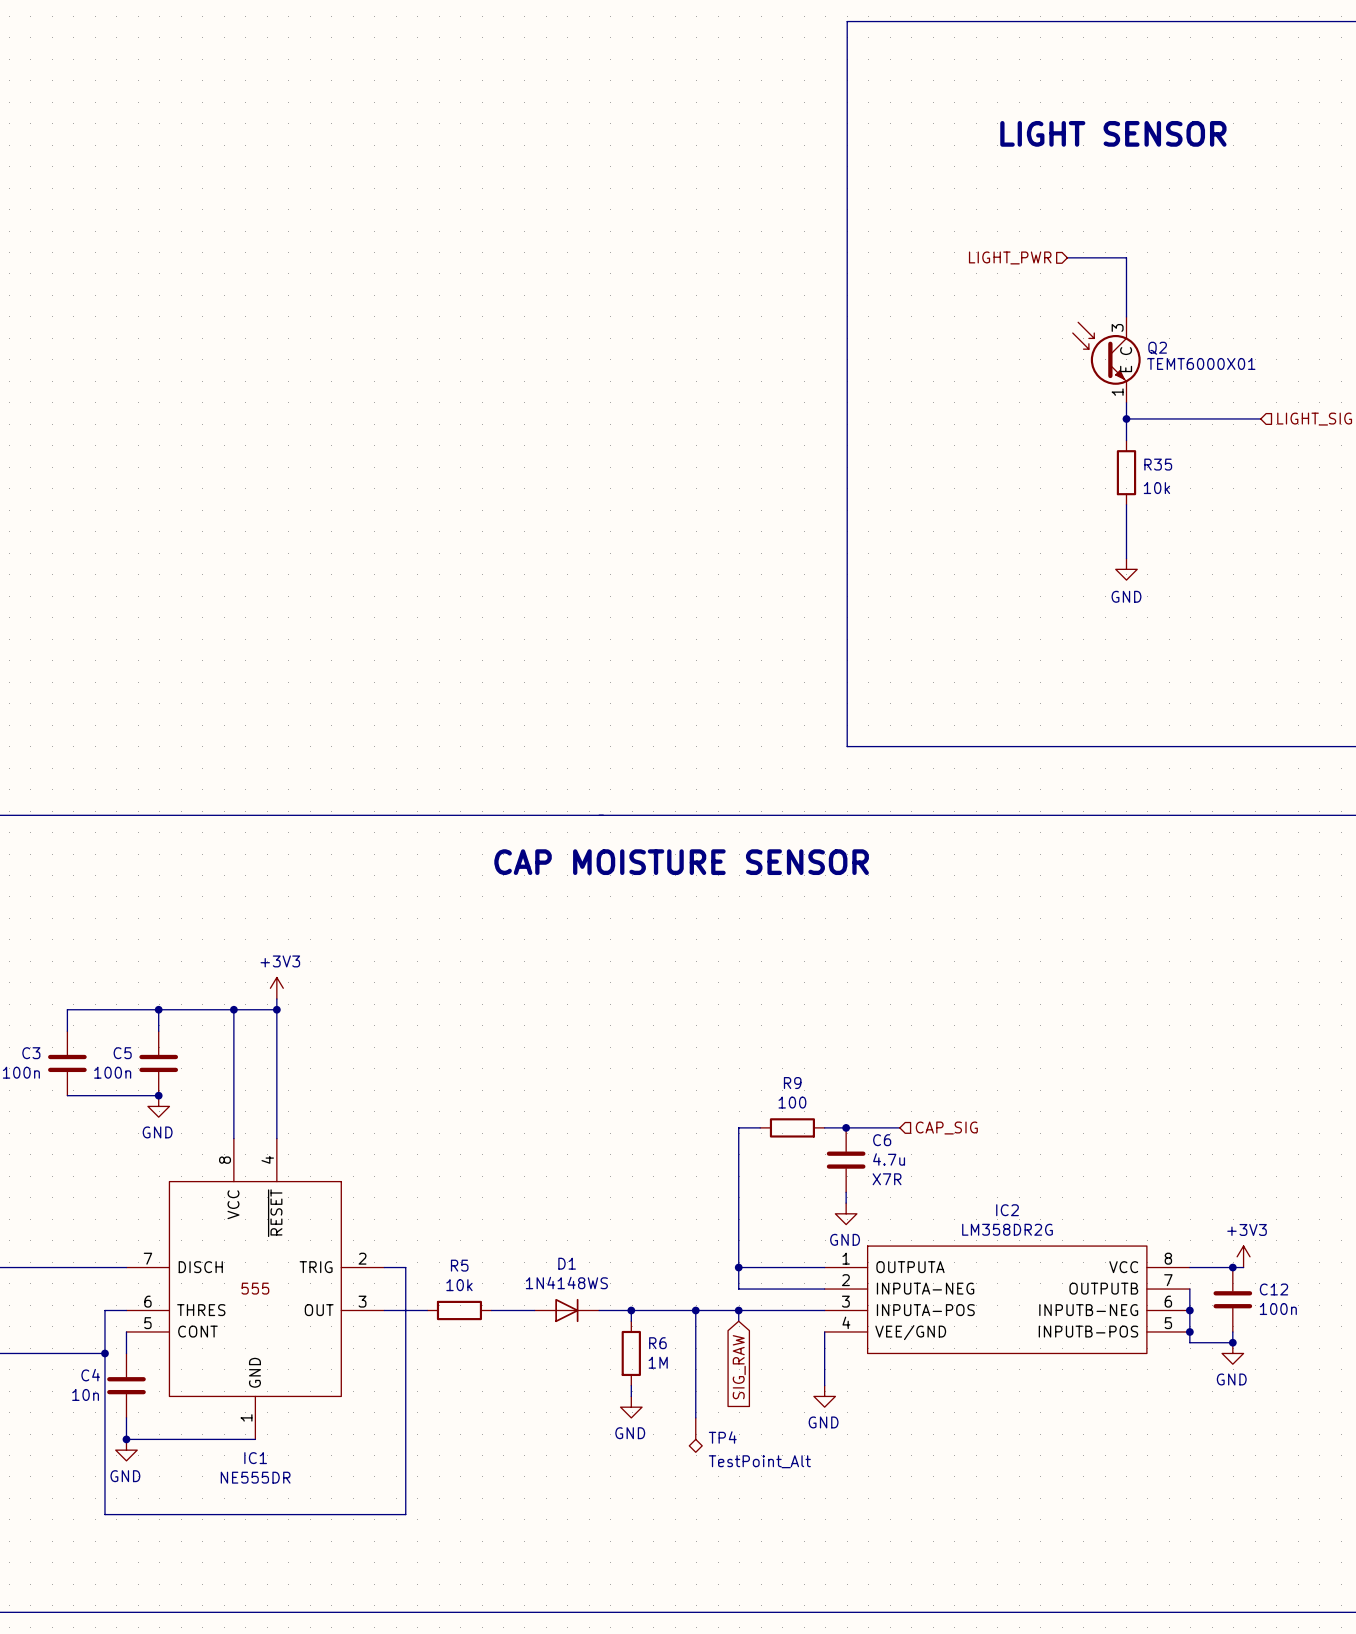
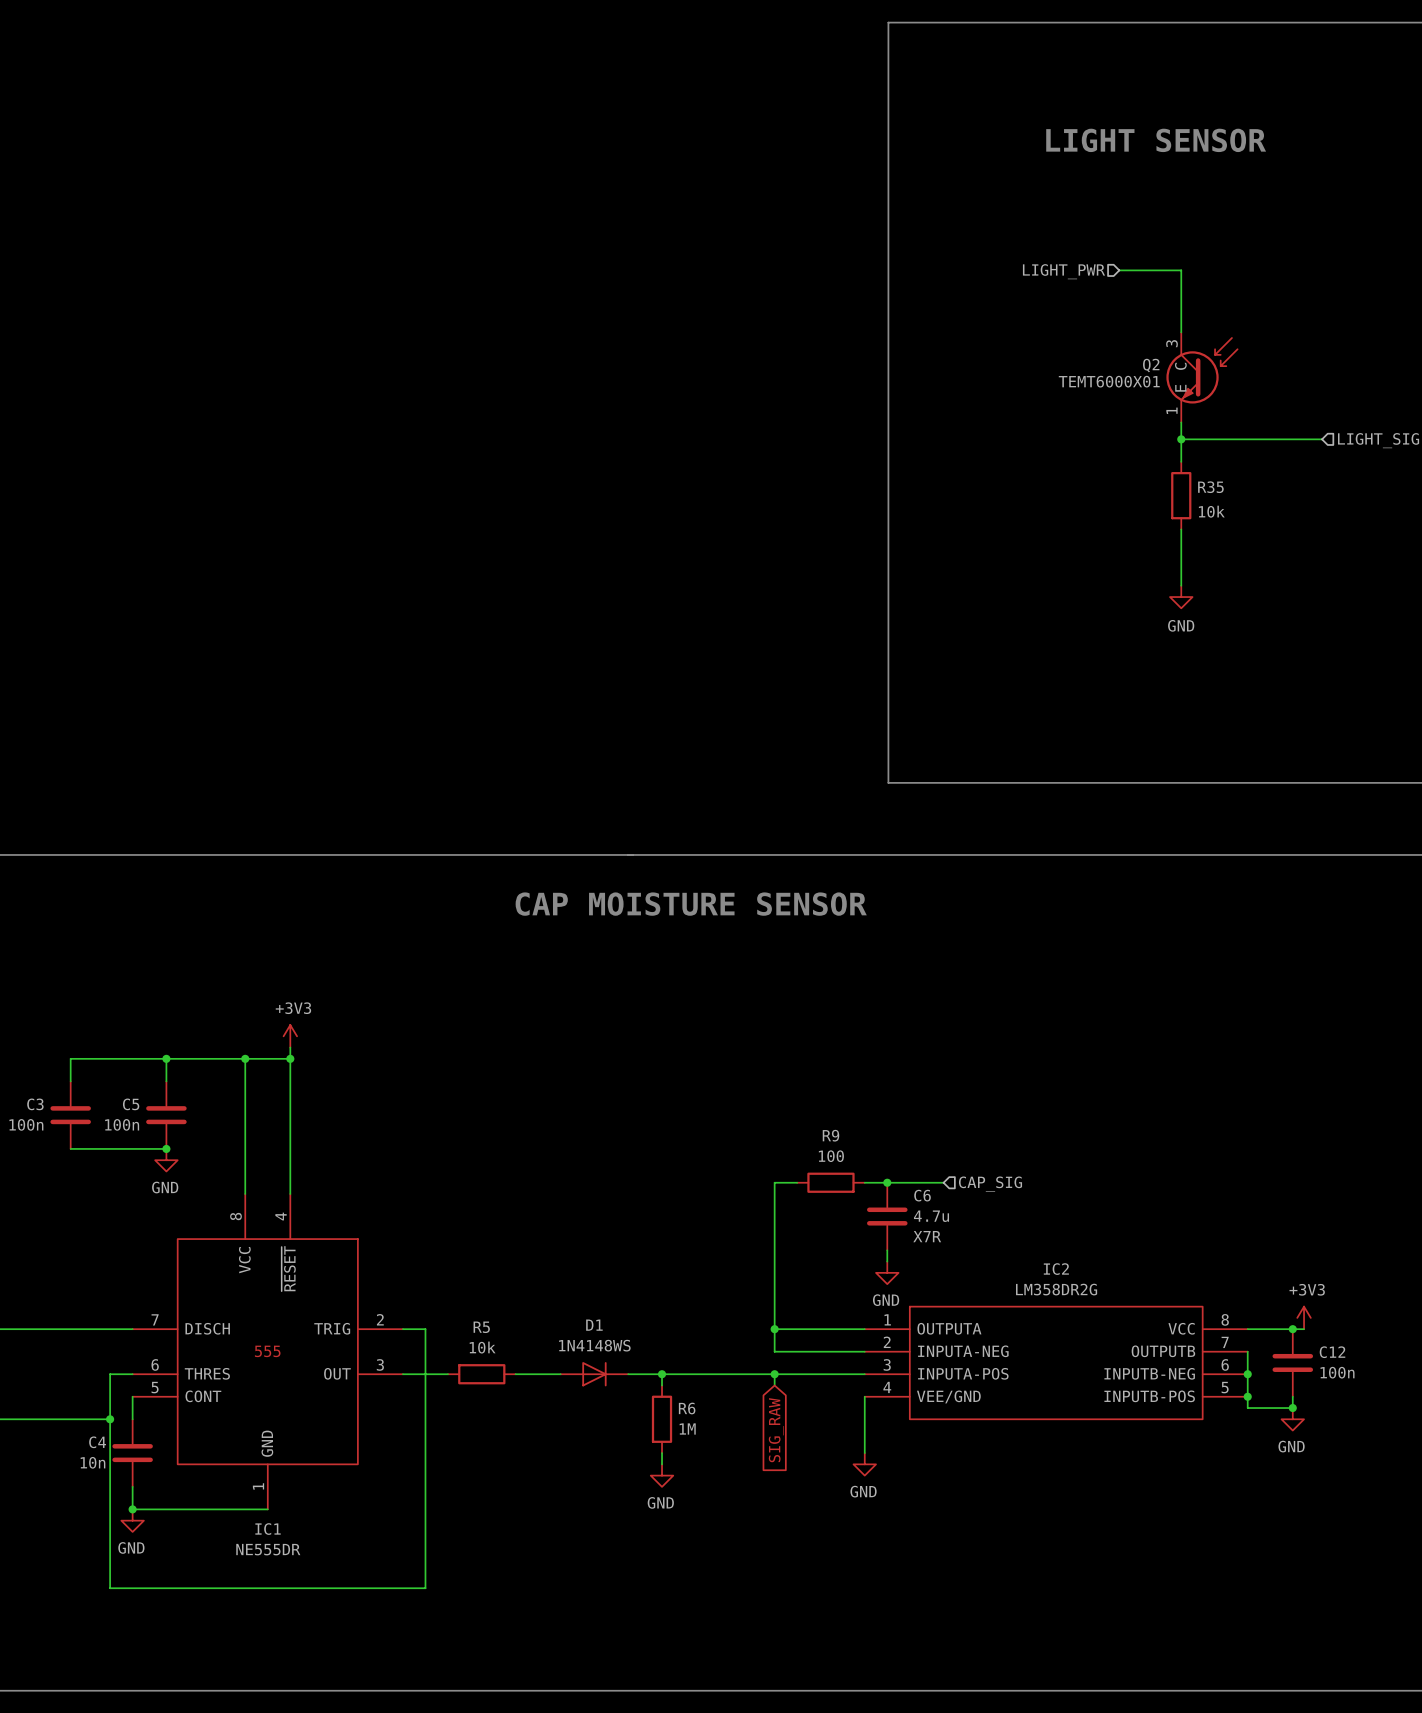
Q2 flip: as is (1106, 353) -> left-right (1201, 370)
wire: (695, 1310) (695, 1417) -> none
junction: (695, 1310) -> none
TP4: TestPoint_Alt (695, 1435) -> none

